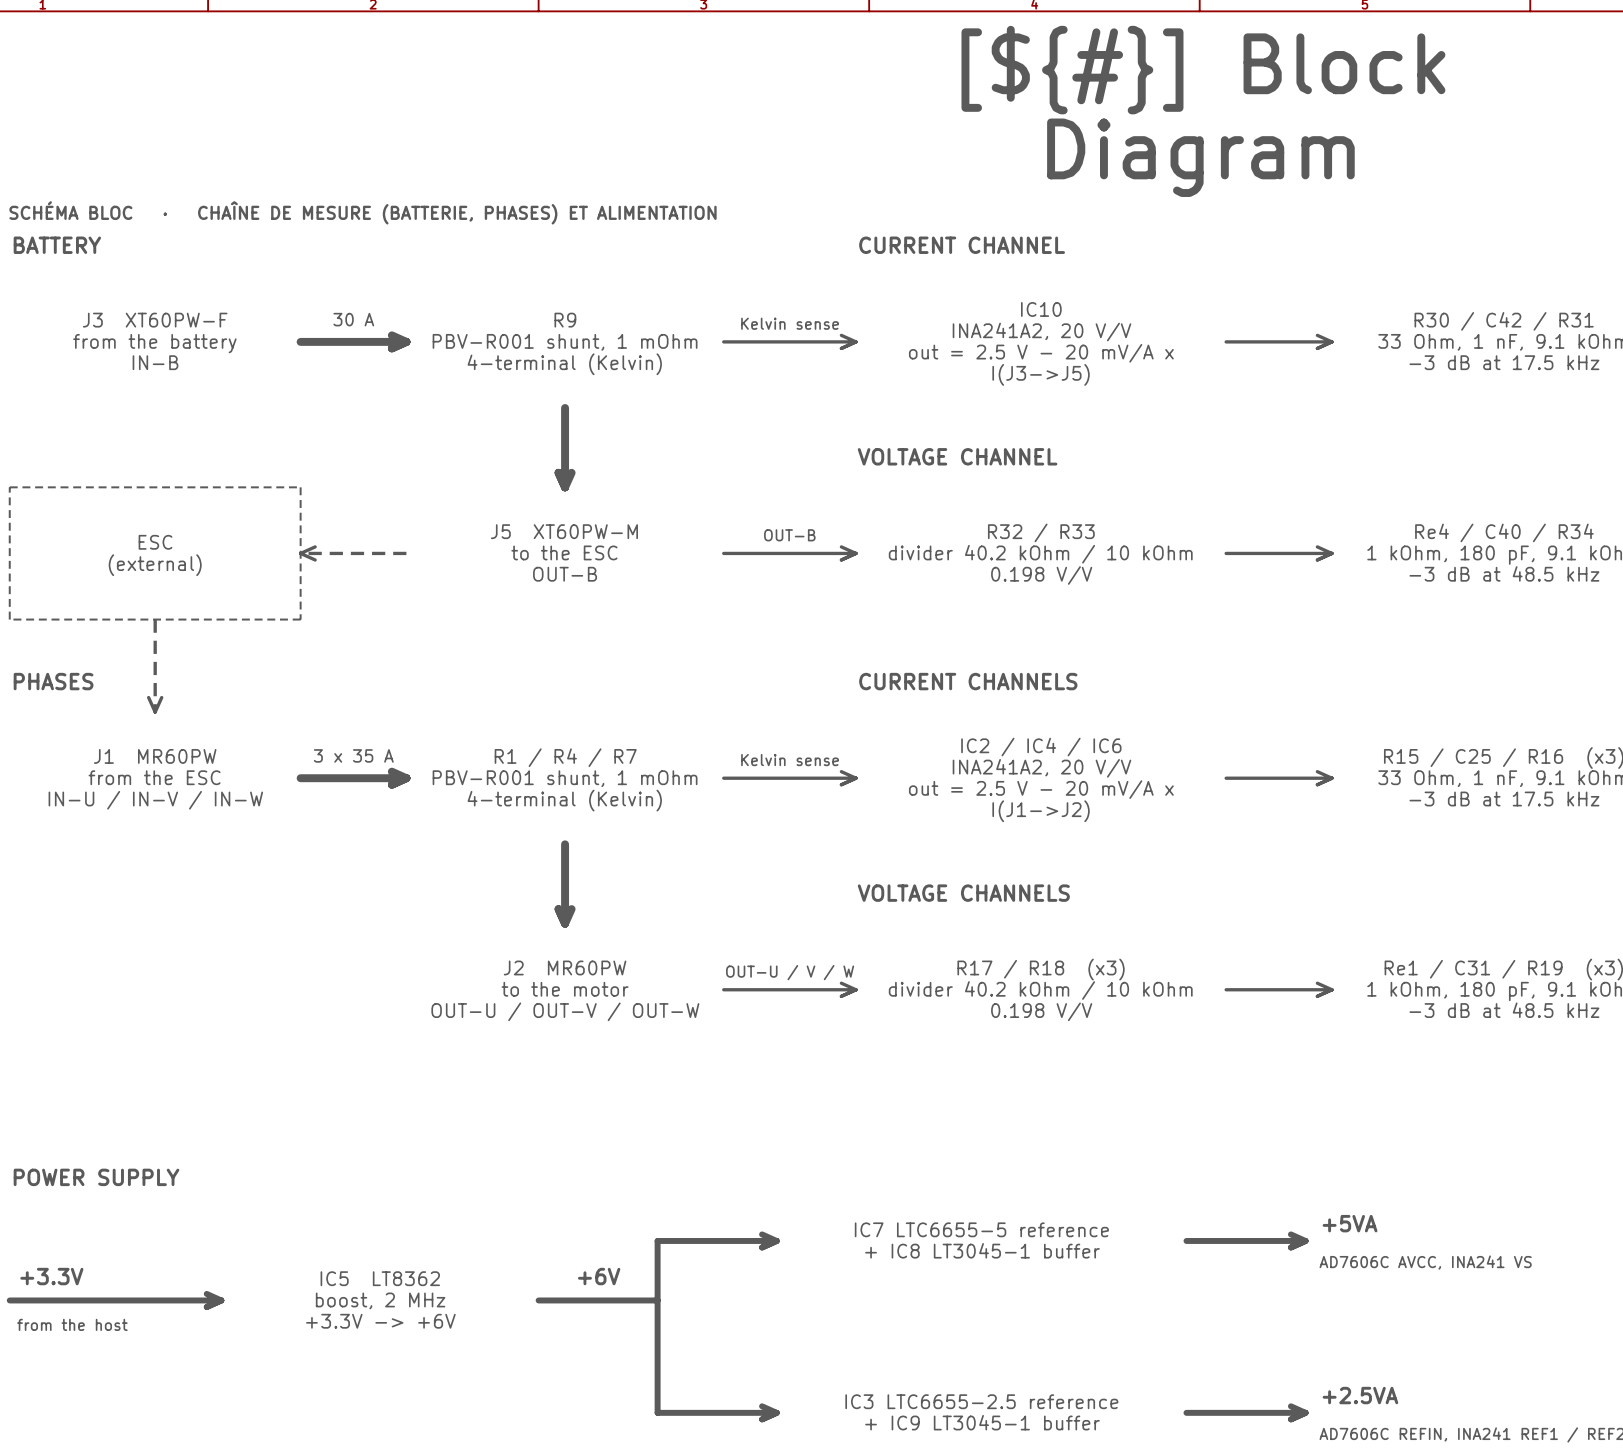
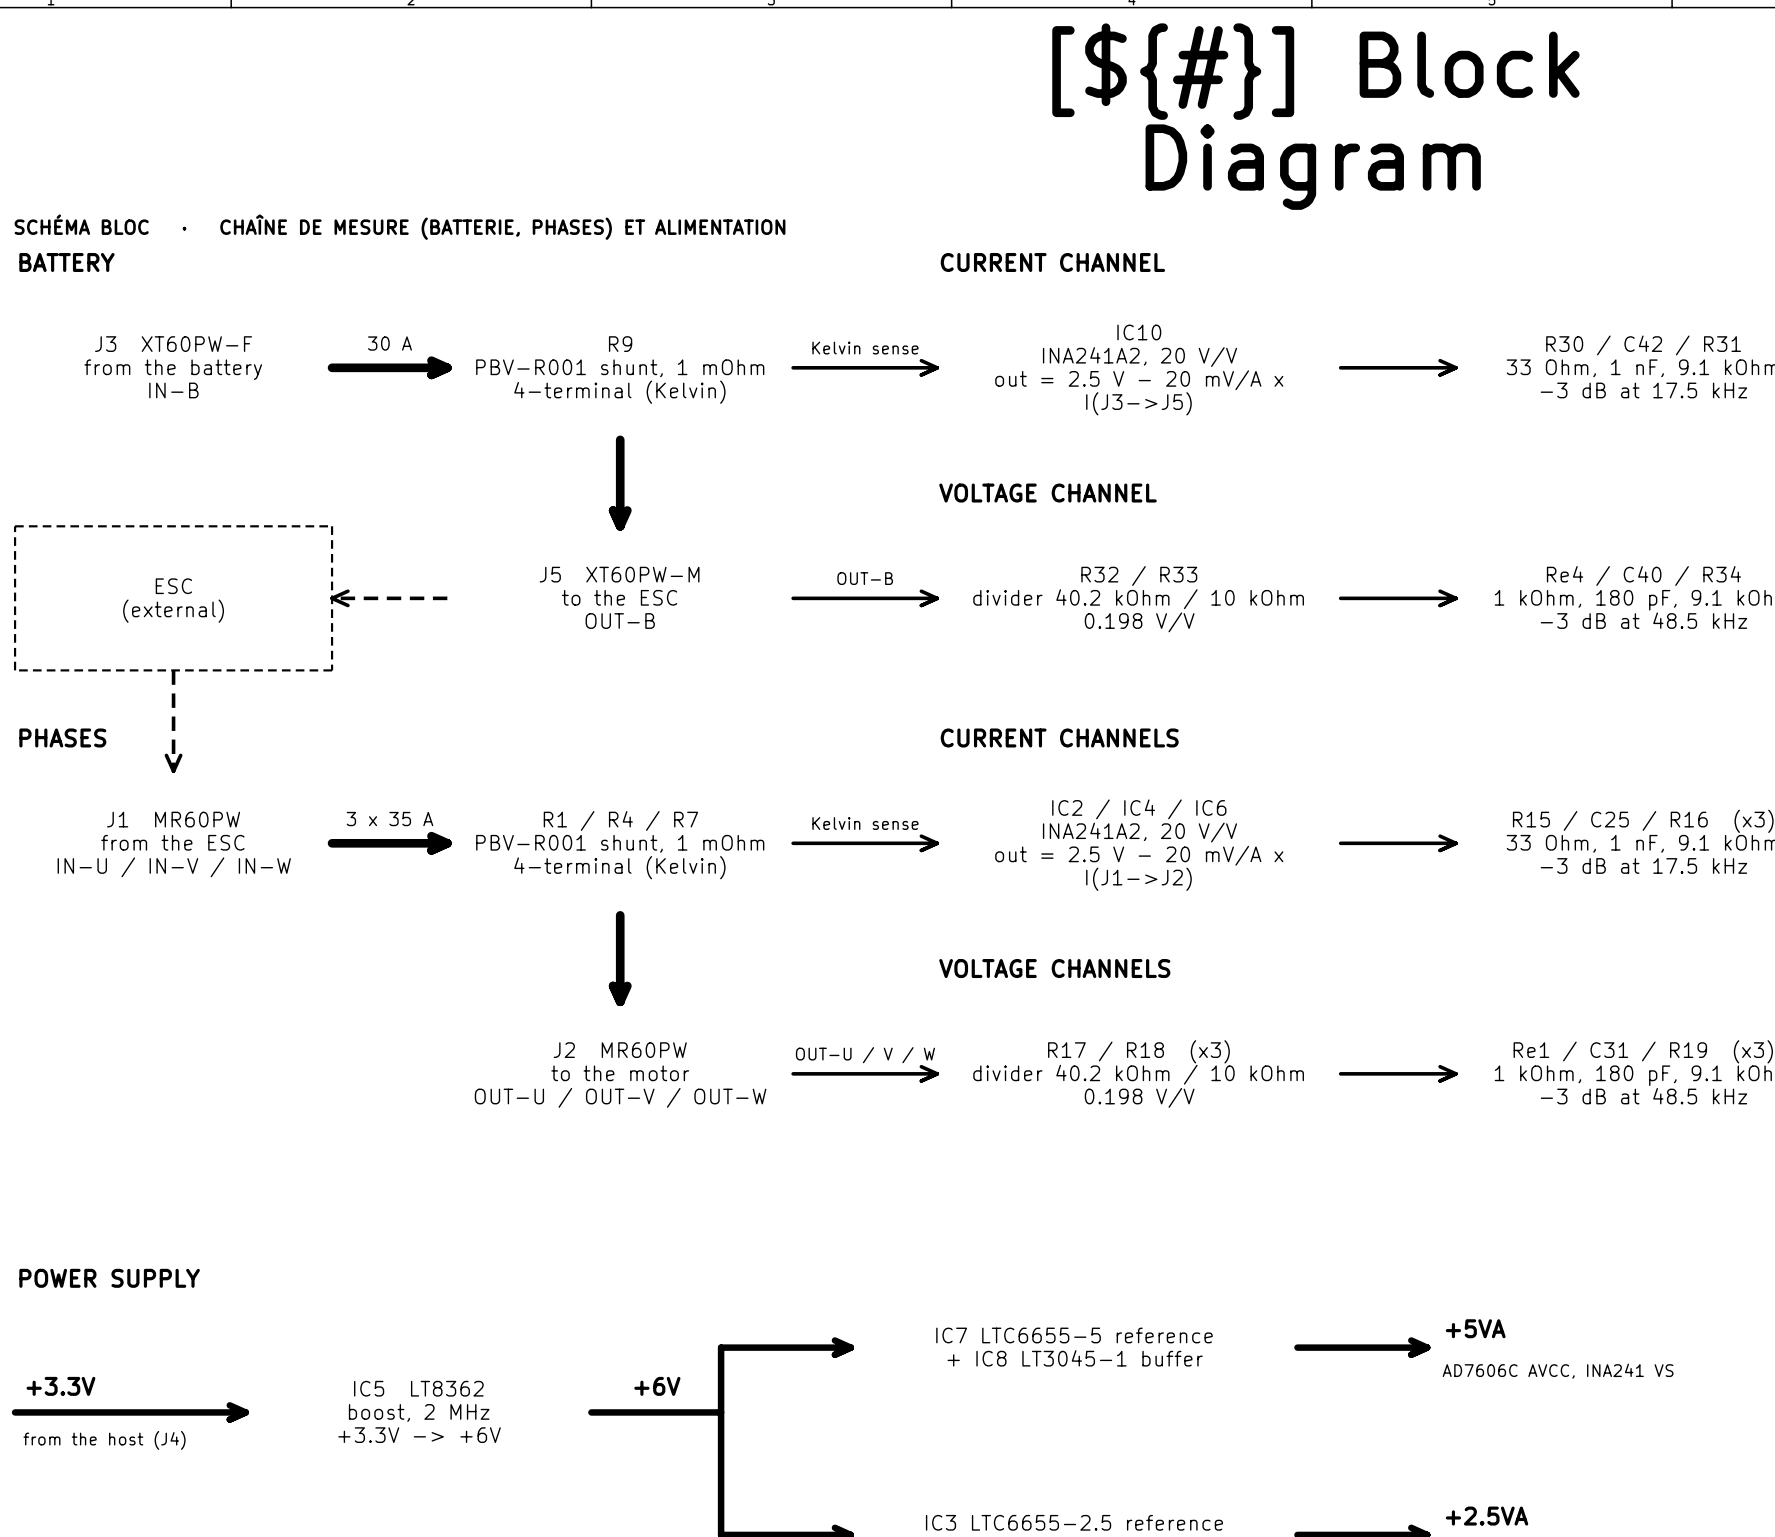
text: from the host (72, 1324) -> from the host (J4) (104, 1440)

